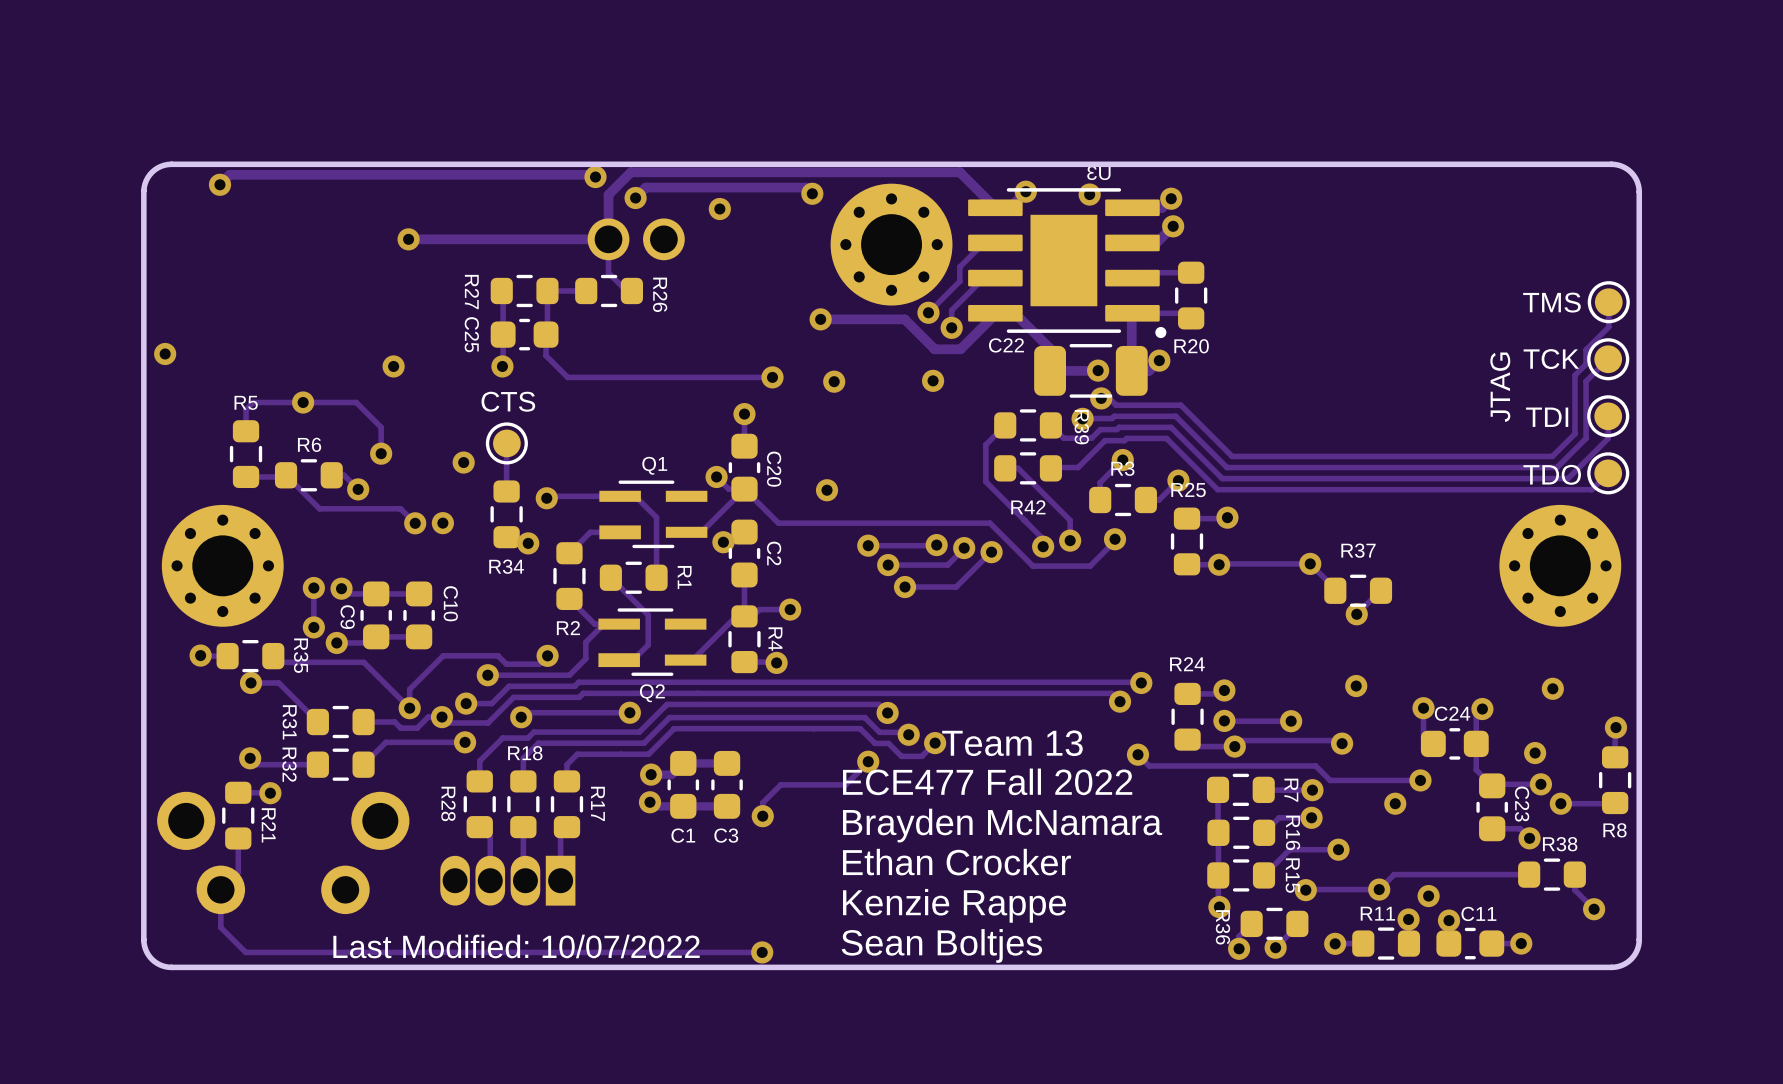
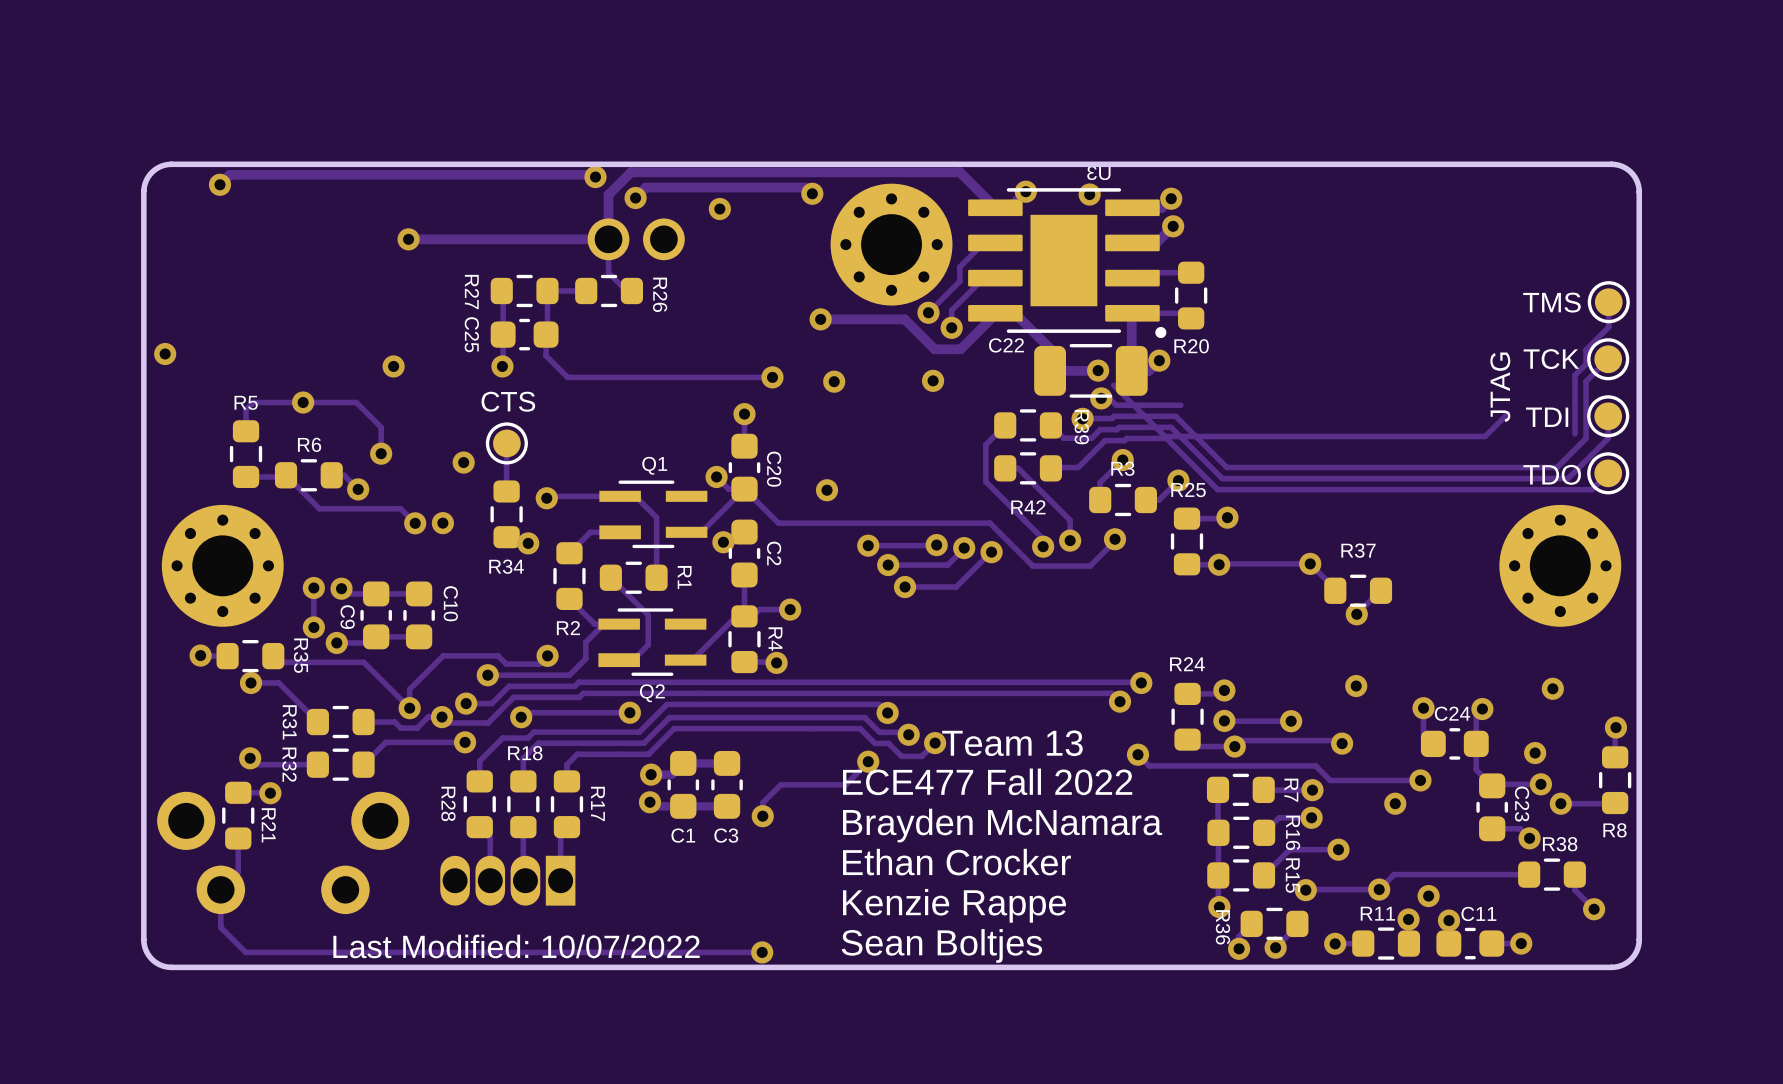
track: (1180, 405) (1232, 456) (1552, 456) (1574, 433) -> (1113, 385) (1164, 436) (1485, 436) (1507, 413)

